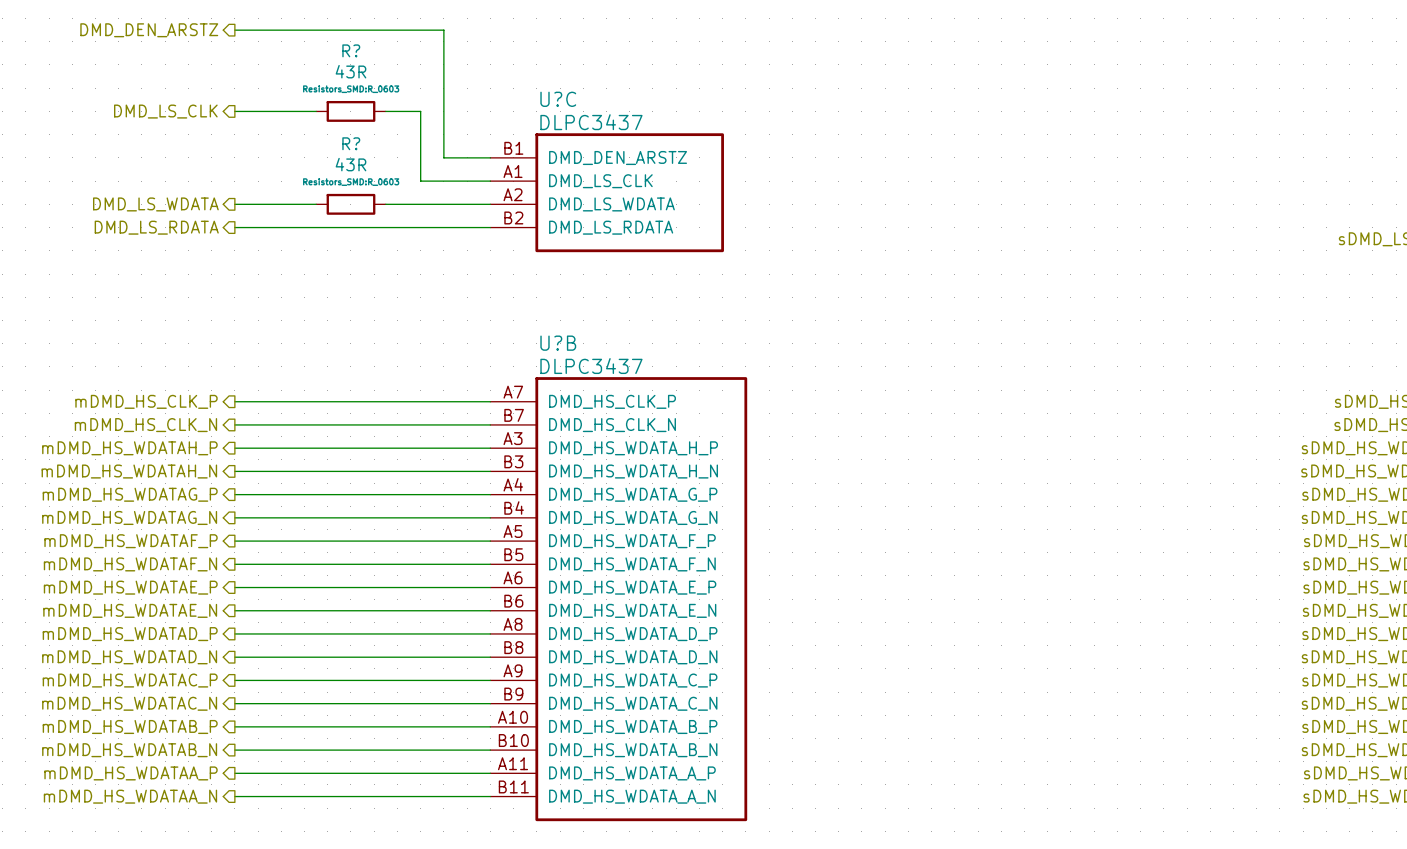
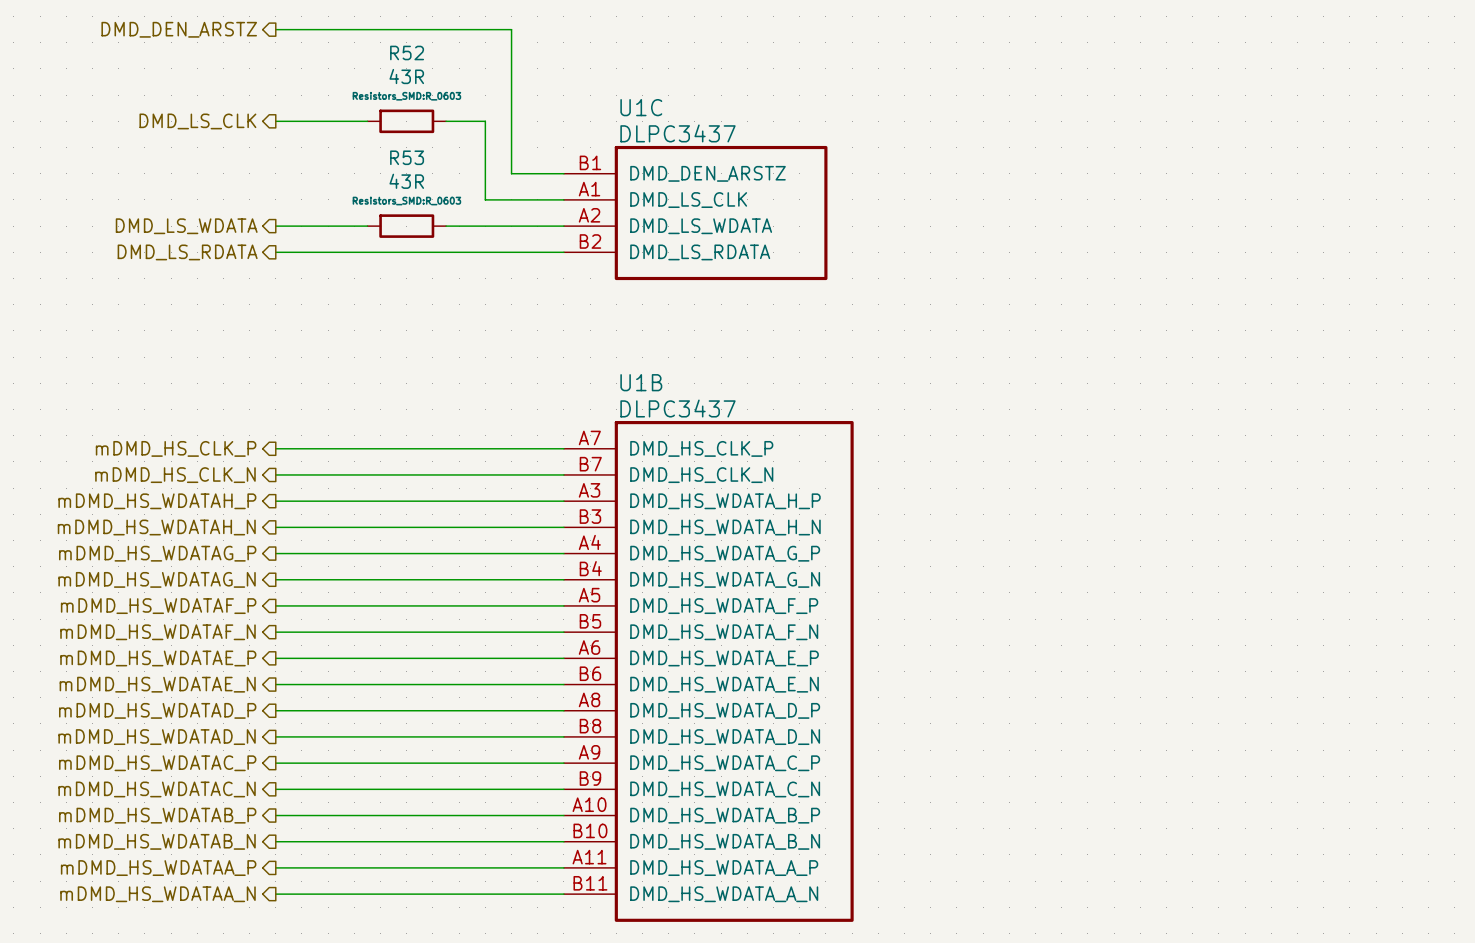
R? name: R? (351, 50) -> R52 (407, 52)
U?C name: U?C (558, 99) -> U1C (641, 107)
R? name: R? (351, 143) -> R53 (407, 157)
U?B name: U?B (558, 343) -> U1B (641, 382)

